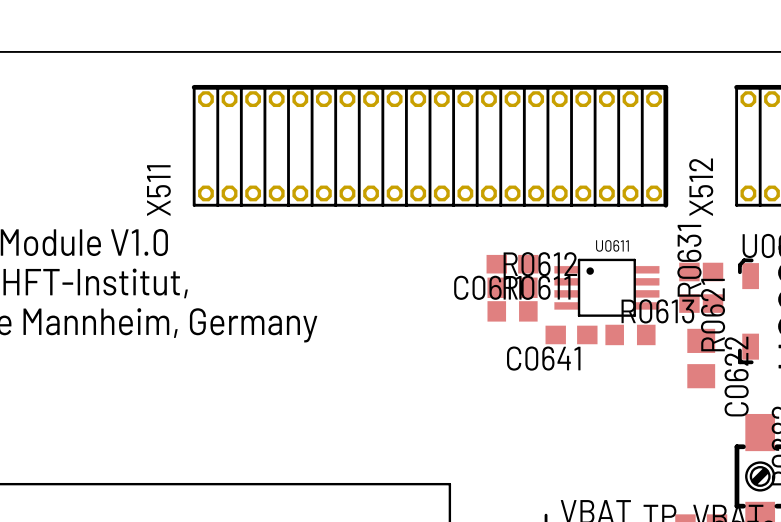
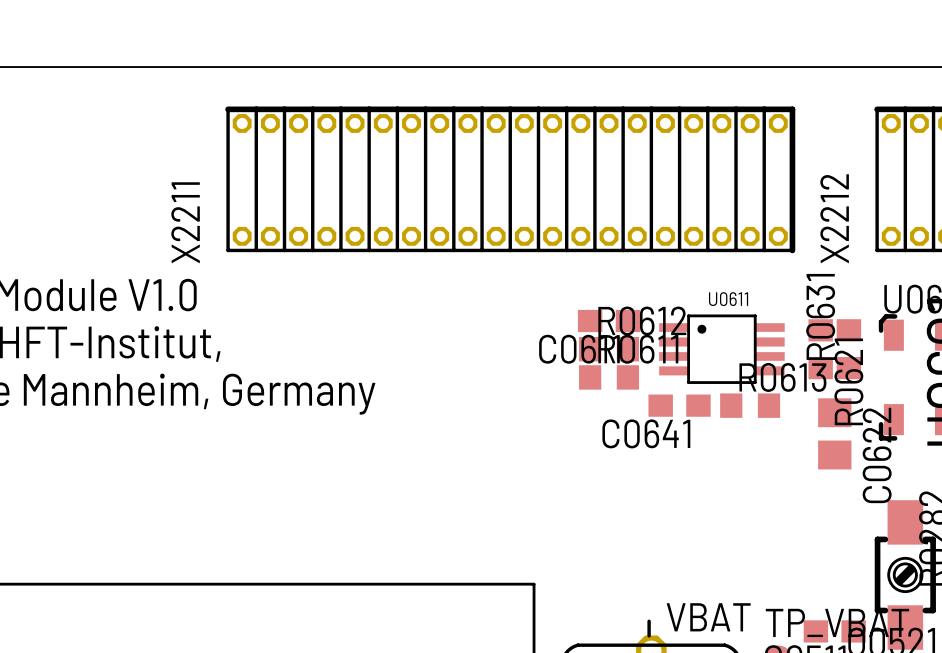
X512 name: X512 (701, 187) -> X2212 (834, 218)
X511 name: X511 (158, 190) -> X2211 (185, 222)

